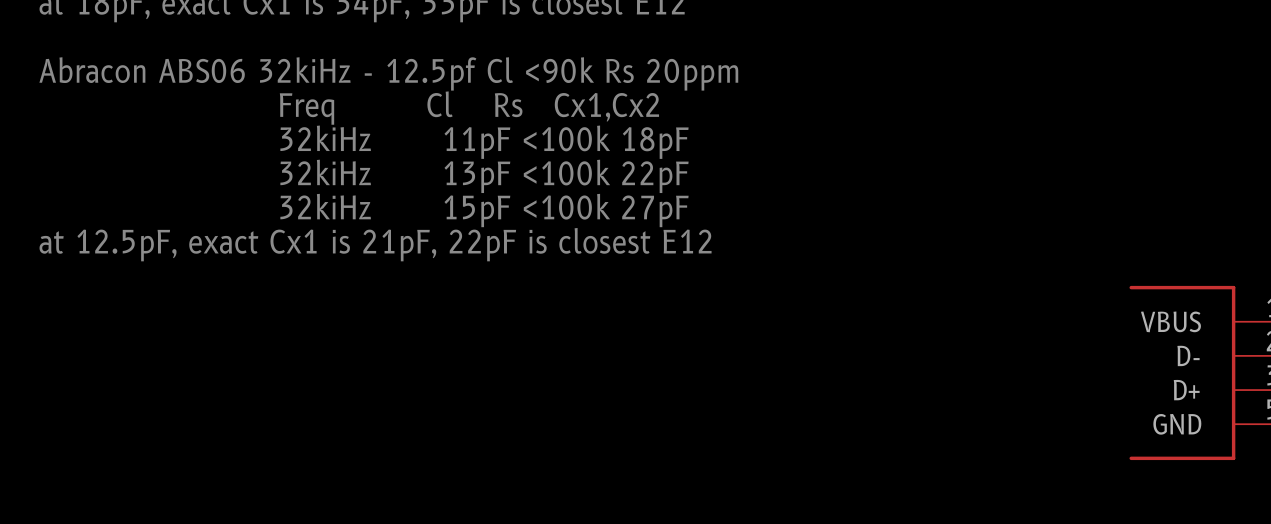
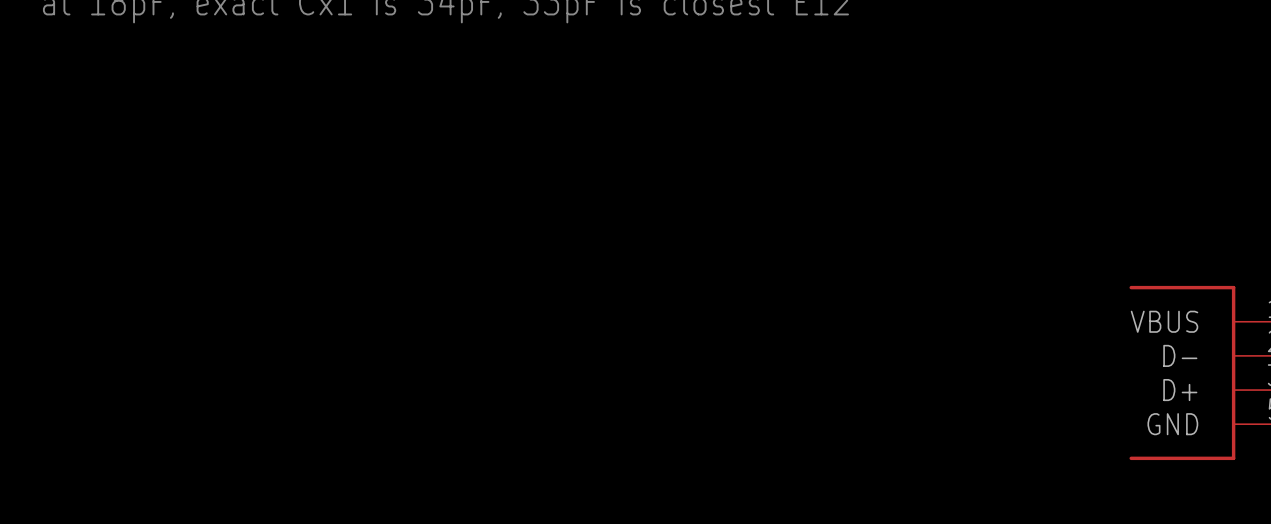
text: Abracon ABS06 32kiHz - 12.5pf Cl <90k Rs 20ppm (388, 73) -> none
text: Freq Cl Rs Cx1,Cx2 (469, 108) -> none
text: 32kiHz 11pF <100k 18pF (484, 142) -> none
text: 32kiHz 13pF <100k 22pF (484, 176) -> none
text: 32kiHz 15pF <100k 27pF (484, 210) -> none
text: at 12.5pF, exact Cx1 is 21pF, 22pF is closest E12 (375, 244) -> none

